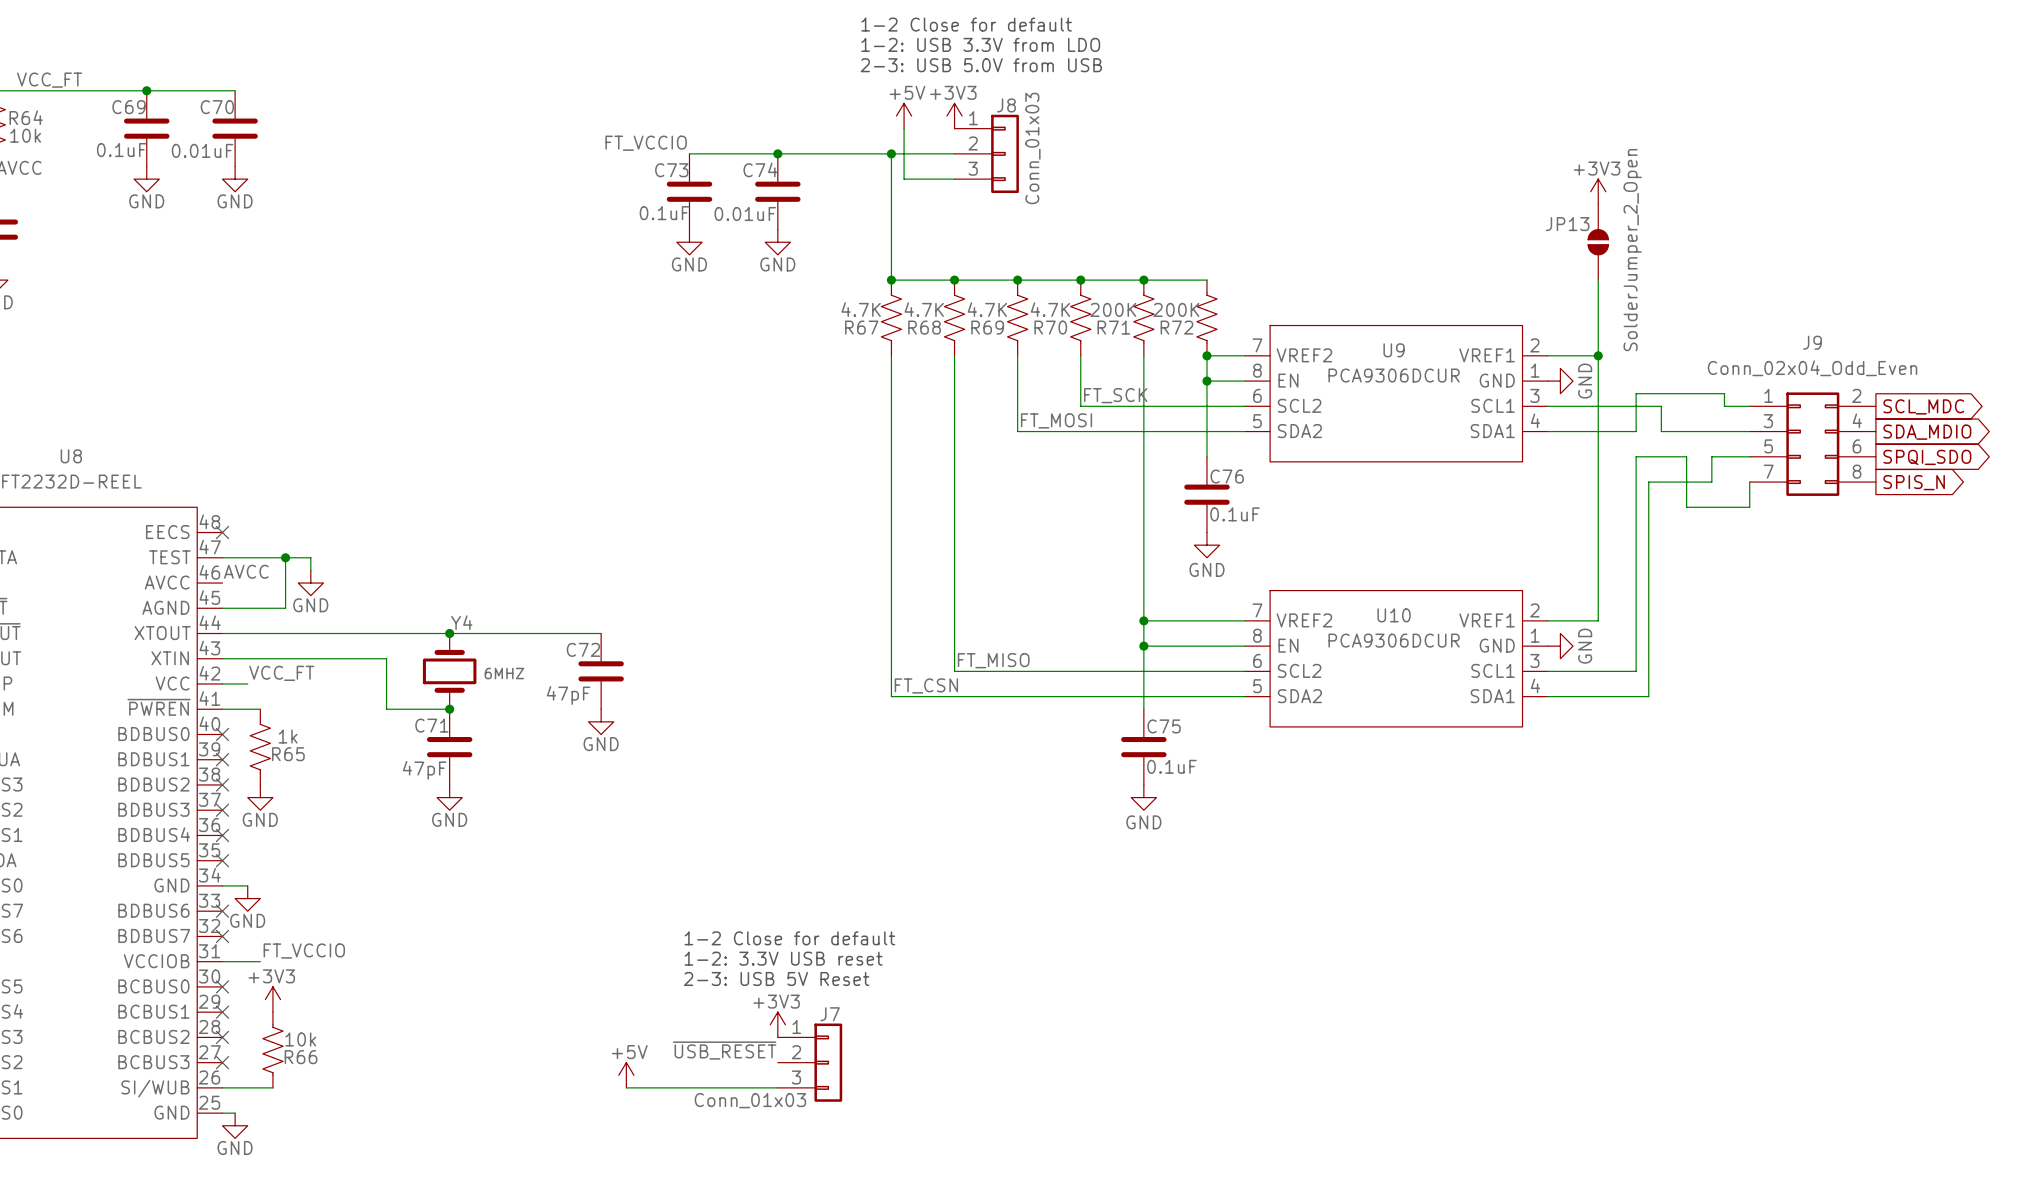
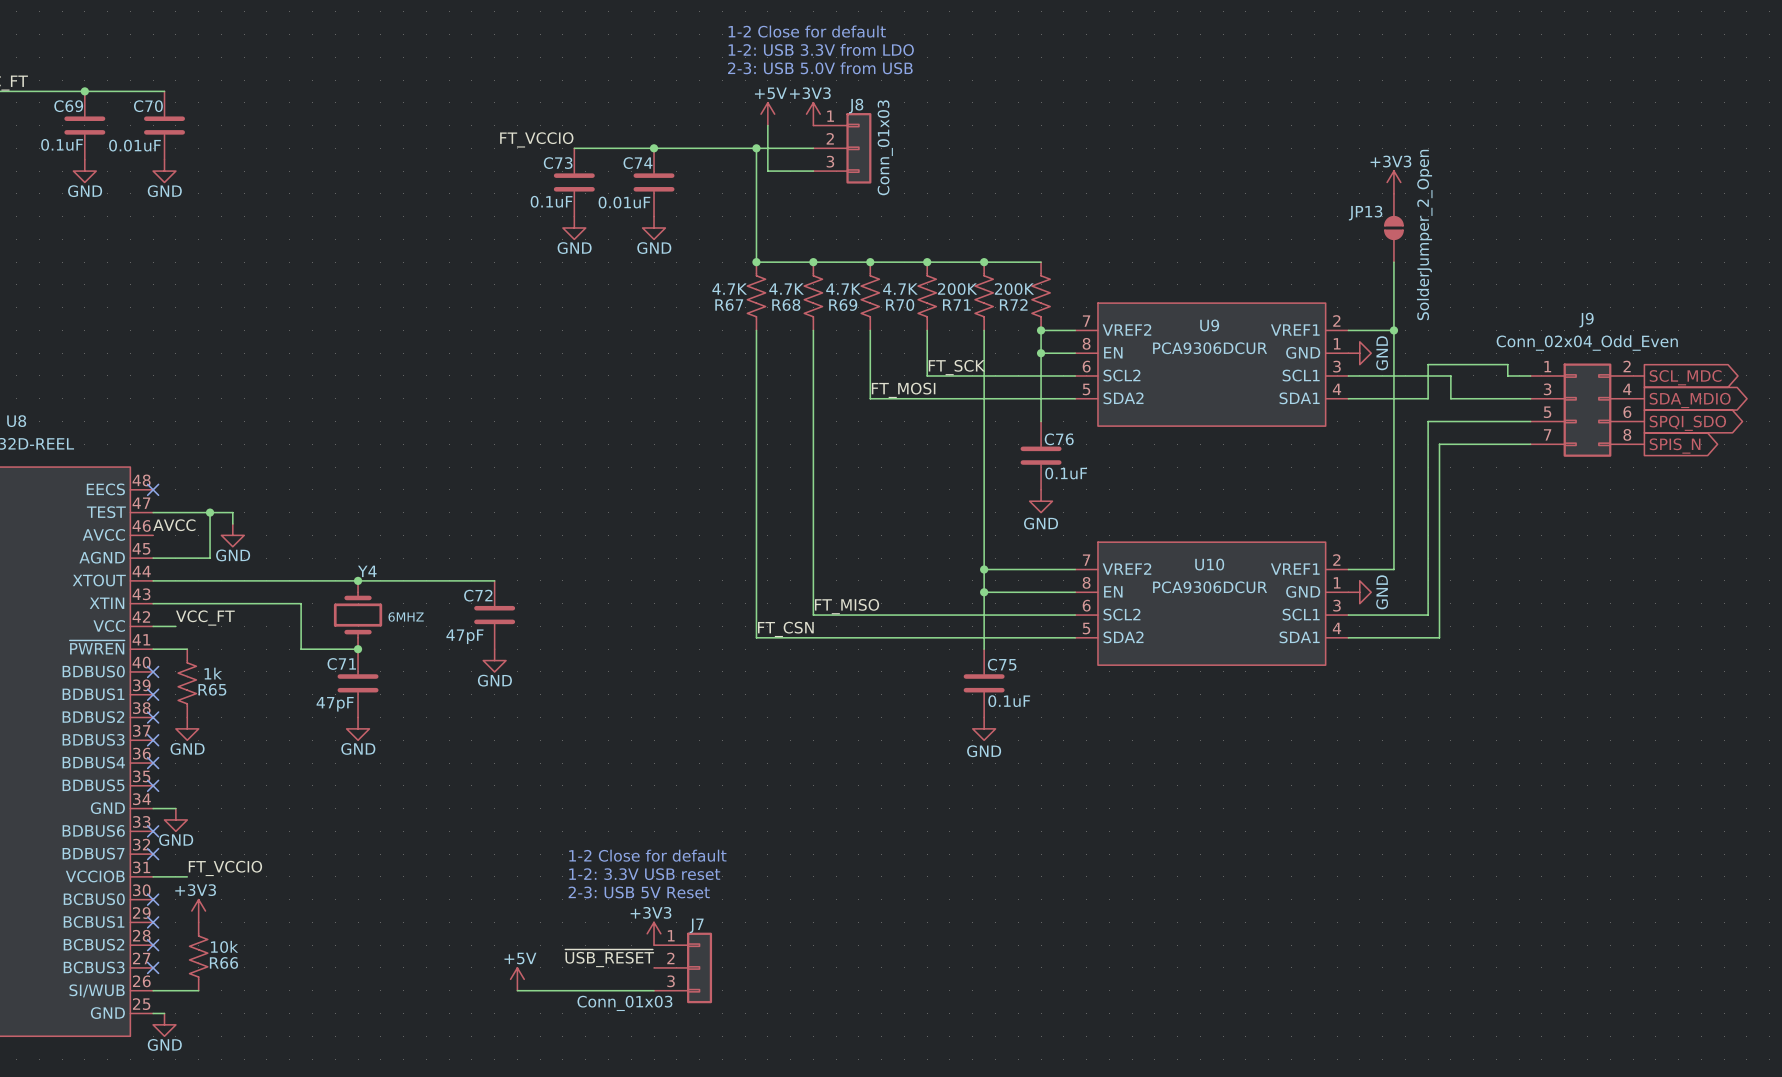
wire: (1686, 456) (1686, 507) (1749, 507) (1749, 482) -> (1496, 444) (1530, 444)
wire: (1711, 456) (1711, 482) -> (1496, 421) (1473, 421)

